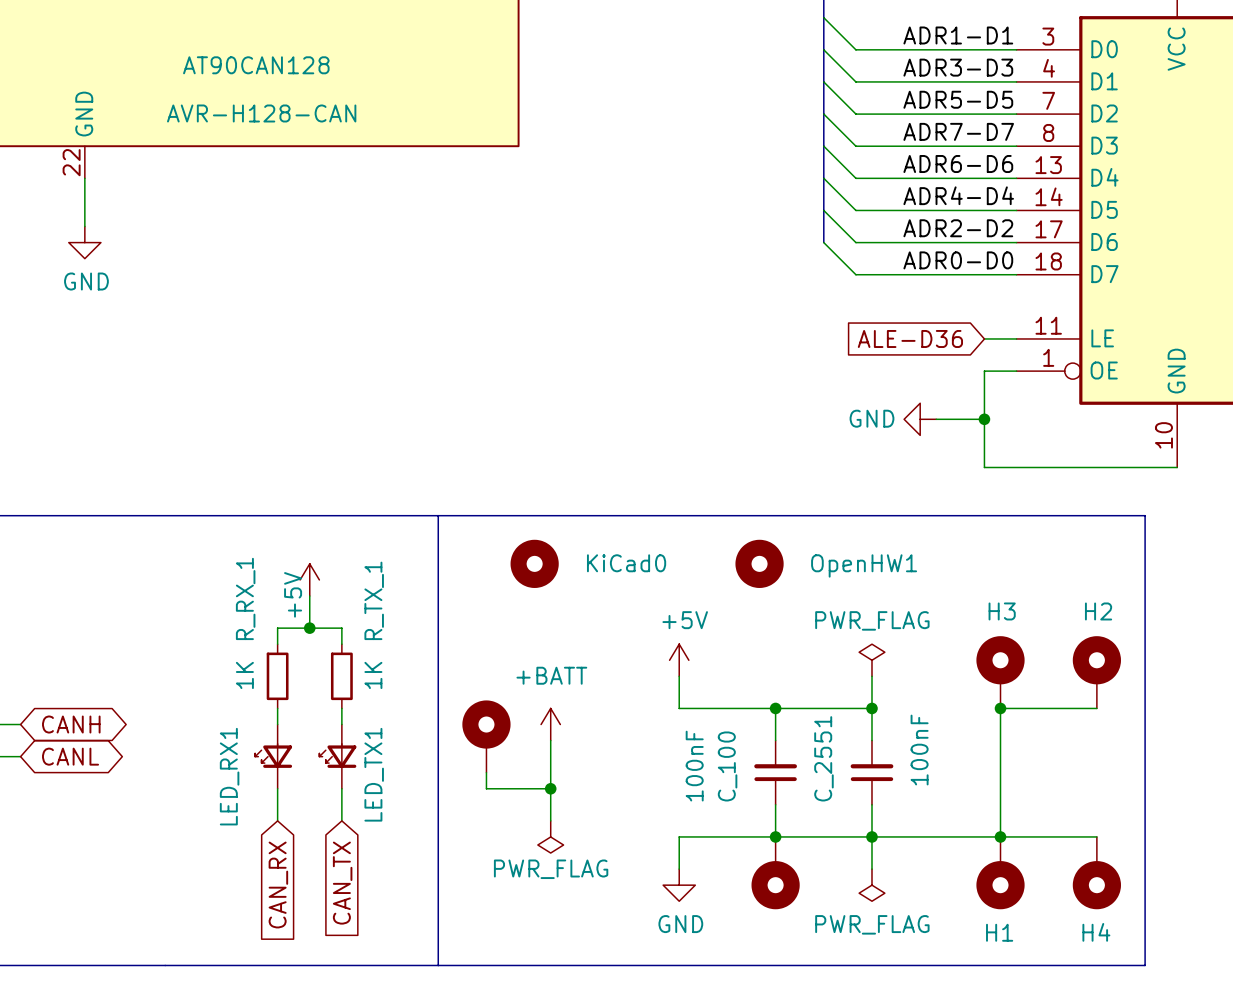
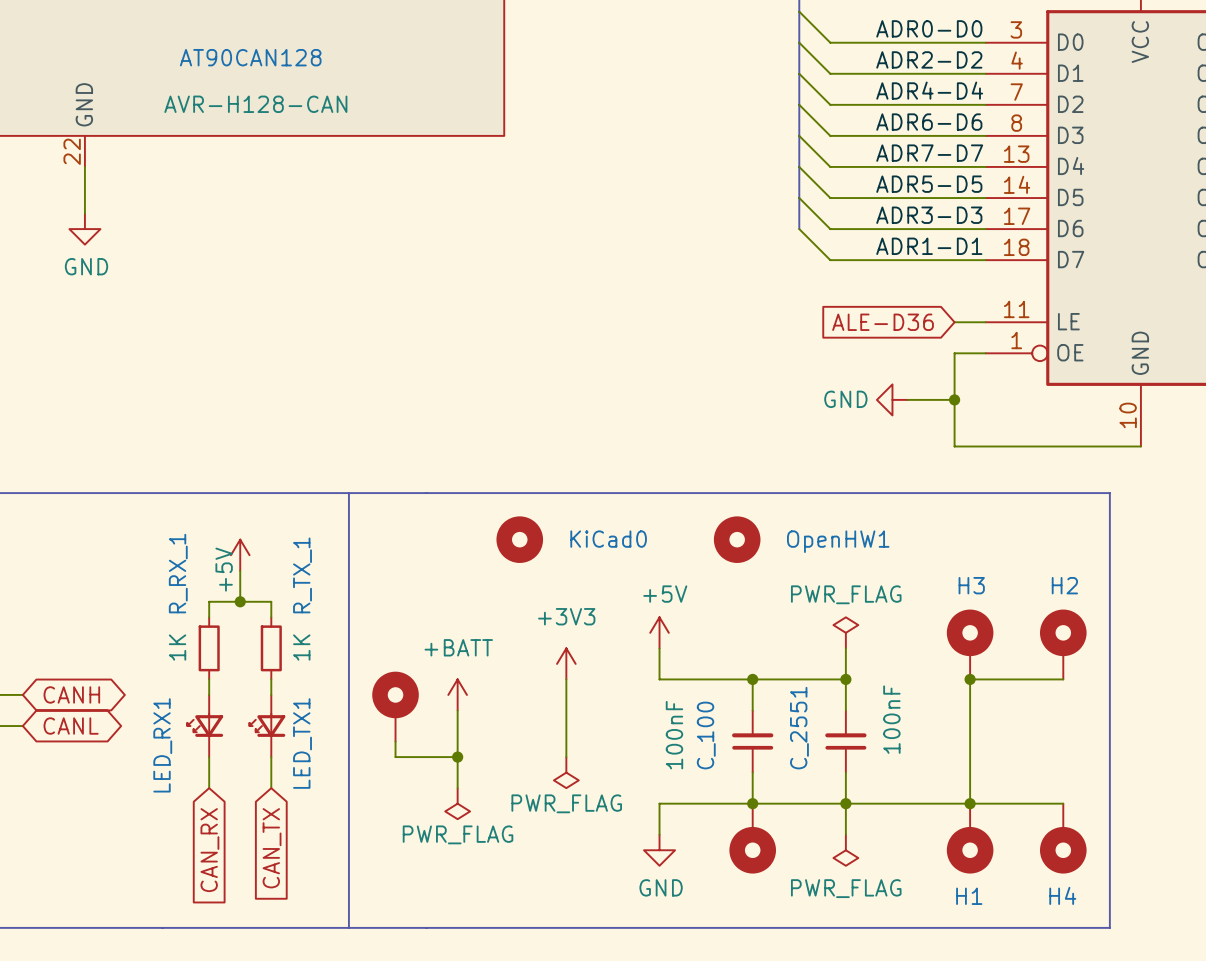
label: ADR1-D1 (958, 35) -> ADR0-D0 (929, 28)
label: ADR3-D3 (958, 67) -> ADR2-D2 (929, 59)
label: ADR5-D5 (958, 99) -> ADR4-D4 (929, 90)
label: ADR7-D7 (958, 131) -> ADR6-D6 (929, 122)
label: ADR6-D6 (958, 164) -> ADR7-D7 (929, 153)
label: ADR4-D4 (958, 195) -> ADR5-D5 (929, 184)
label: ADR2-D2 (958, 228) -> ADR3-D3 (929, 215)
label: ADR0-D0 (958, 260) -> ADR1-D1 (929, 246)
line: (438, 515) (438, 965) -> (348, 493) (348, 927)
power symbol position: +5V (309, 579) -> +5V (240, 555)
wire: (309, 596) (309, 628) -> (240, 570) (240, 601)
R_RX_1 name: R_RX_1 (245, 598) -> R_TX_1 (302, 575)
wire: (277, 628) (341, 628) (341, 644) -> (271, 601) (209, 601) (209, 617)
junction position: (309, 628) -> (240, 601)
R_RX_1 value position: 1K (244, 675) -> 1K (301, 647)
R_RX_1: none -> 1K (209, 648)
R_TX_1: 1K (341, 676) -> none
power symbol: none -> +3V3 (566, 663)
wire: (341, 708) (341, 724) -> (209, 679) (209, 694)
wire: none -> (566, 679) (566, 757)
power symbol position: +BATT (550, 724) -> +BATT (457, 694)
part position: (486, 736) -> (395, 706)
wire: (550, 740) (550, 820) -> (457, 710) (457, 788)
LED_RX1: none -> (205, 726)
LED_TX1: (337, 756) -> none
wire: (486, 772) (486, 788) (550, 788) -> (395, 741) (395, 757) (457, 757)
LED_RX1 name: LED_RX1 (229, 776) -> LED_TX1 (302, 743)
wire: (341, 788) (341, 820) -> (209, 757) (209, 788)
junction: none -> (457, 757)
junction: (550, 788) -> none
power symbol: none -> PWR_FLAG (566, 772)
power symbol: none -> PWR_FLAG (457, 803)
power symbol: PWR_FLAG (550, 836) -> none
global label: CAN_TX (342, 883) -> none
global label: none -> CAN_RX (209, 850)
global label: CAN_RX (278, 884) -> CAN_TX (272, 848)

